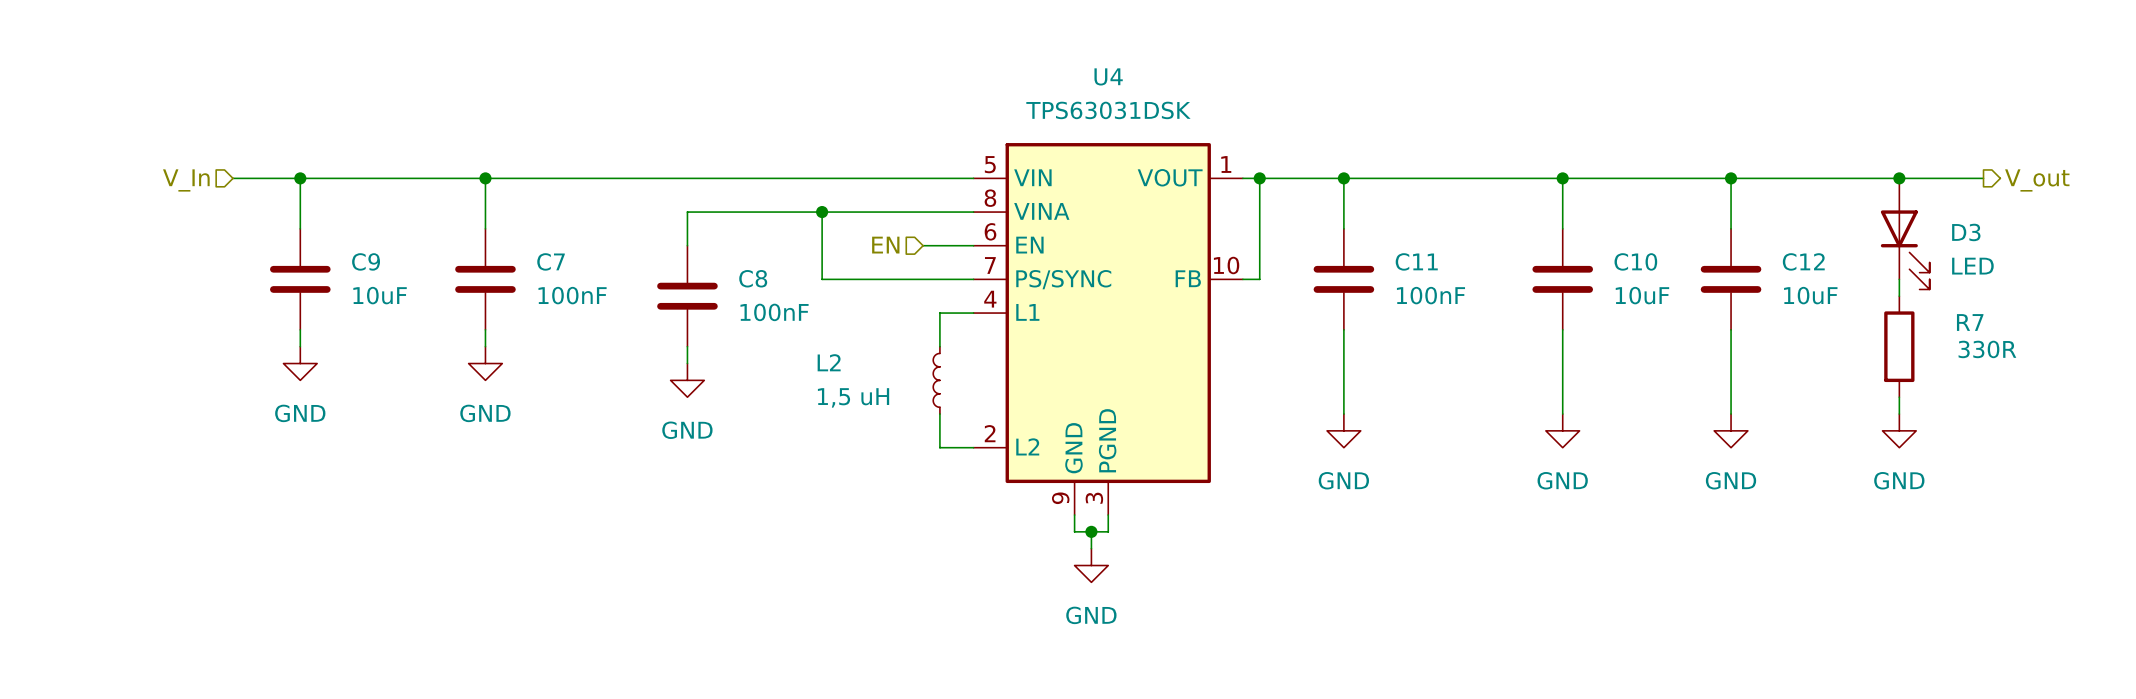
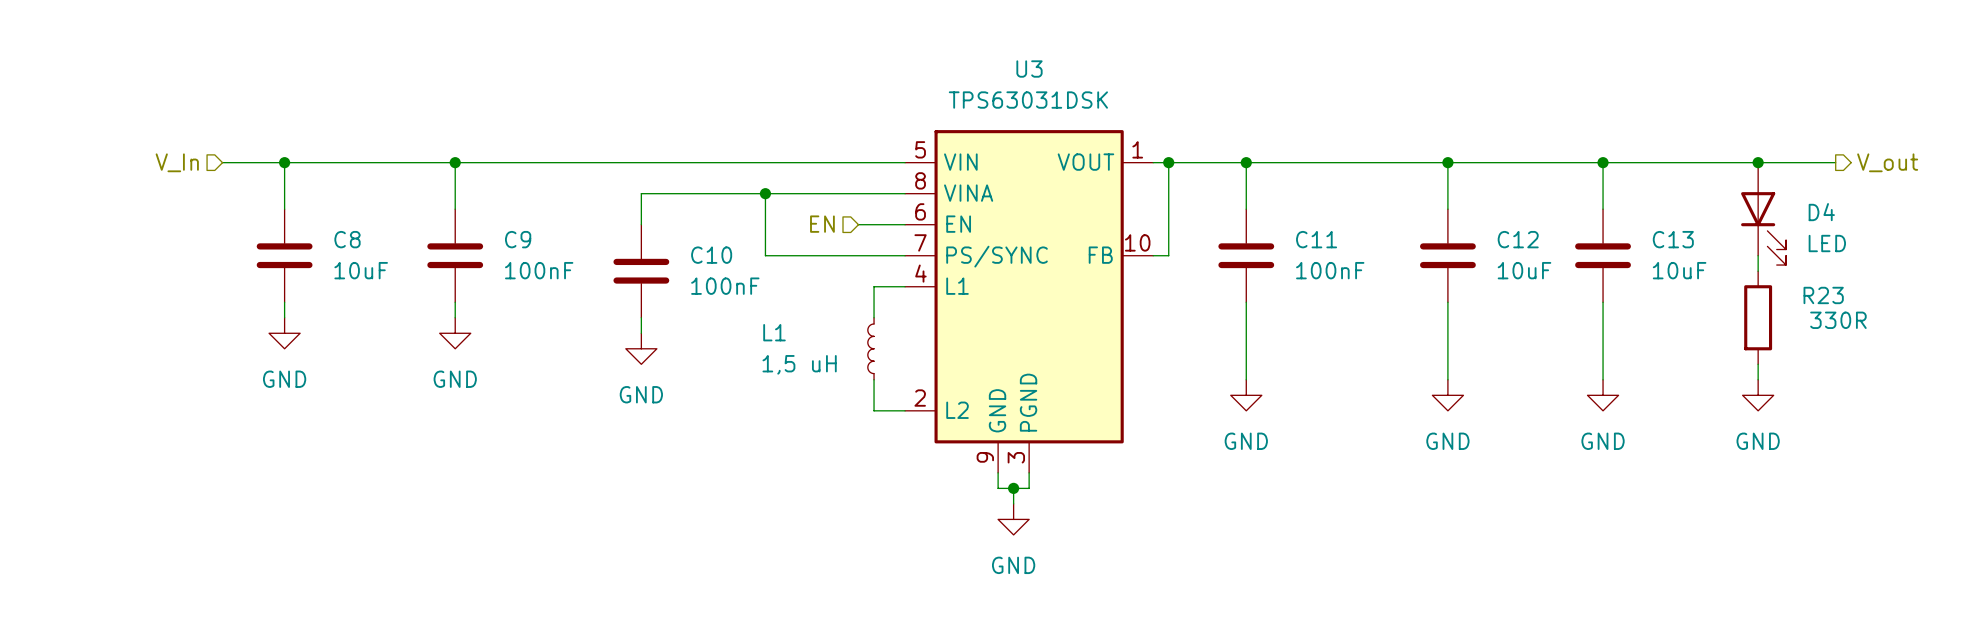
U4 name: U4 (1108, 76) -> U3 (1029, 69)
D3 name: D3 (1966, 232) -> D4 (1821, 212)
C9 name: C9 (366, 261) -> C8 (347, 239)
C7 name: C7 (551, 261) -> C9 (518, 239)
C10 name: C10 (1635, 261) -> C12 (1518, 239)
C12 name: C12 (1803, 261) -> C13 (1673, 239)
C8 name: C8 (753, 278) -> C10 (711, 255)
R7 name: R7 (1970, 322) -> R23 (1823, 295)
L2 name: L2 (829, 362) -> L1 (774, 332)

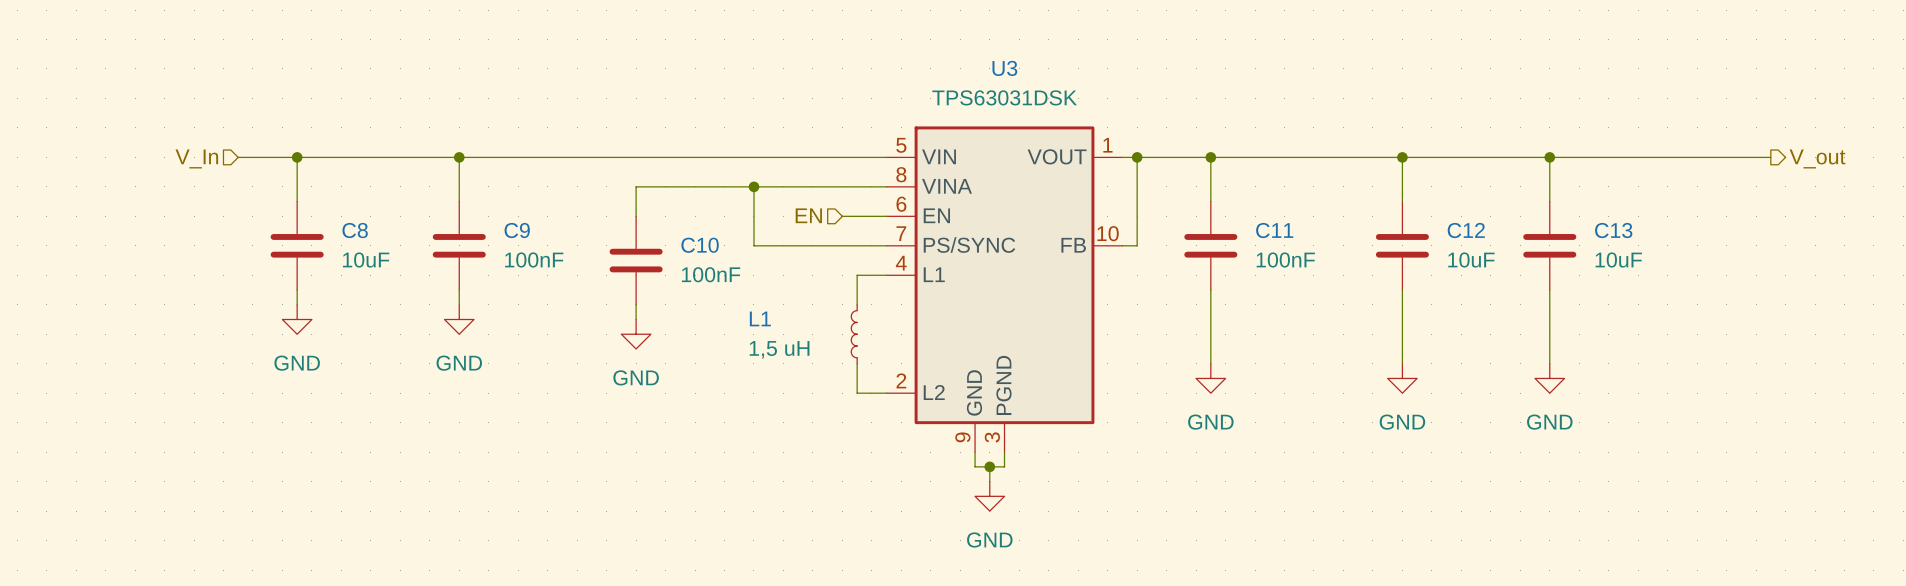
junction: (1758, 162) -> none
D4: LED (1763, 213) -> none
wire: (1758, 255) (1758, 271) -> none
R23: 330R (1758, 317) -> none
wire: (1758, 364) (1758, 379) -> none
power symbol: GND (1758, 395) -> none

